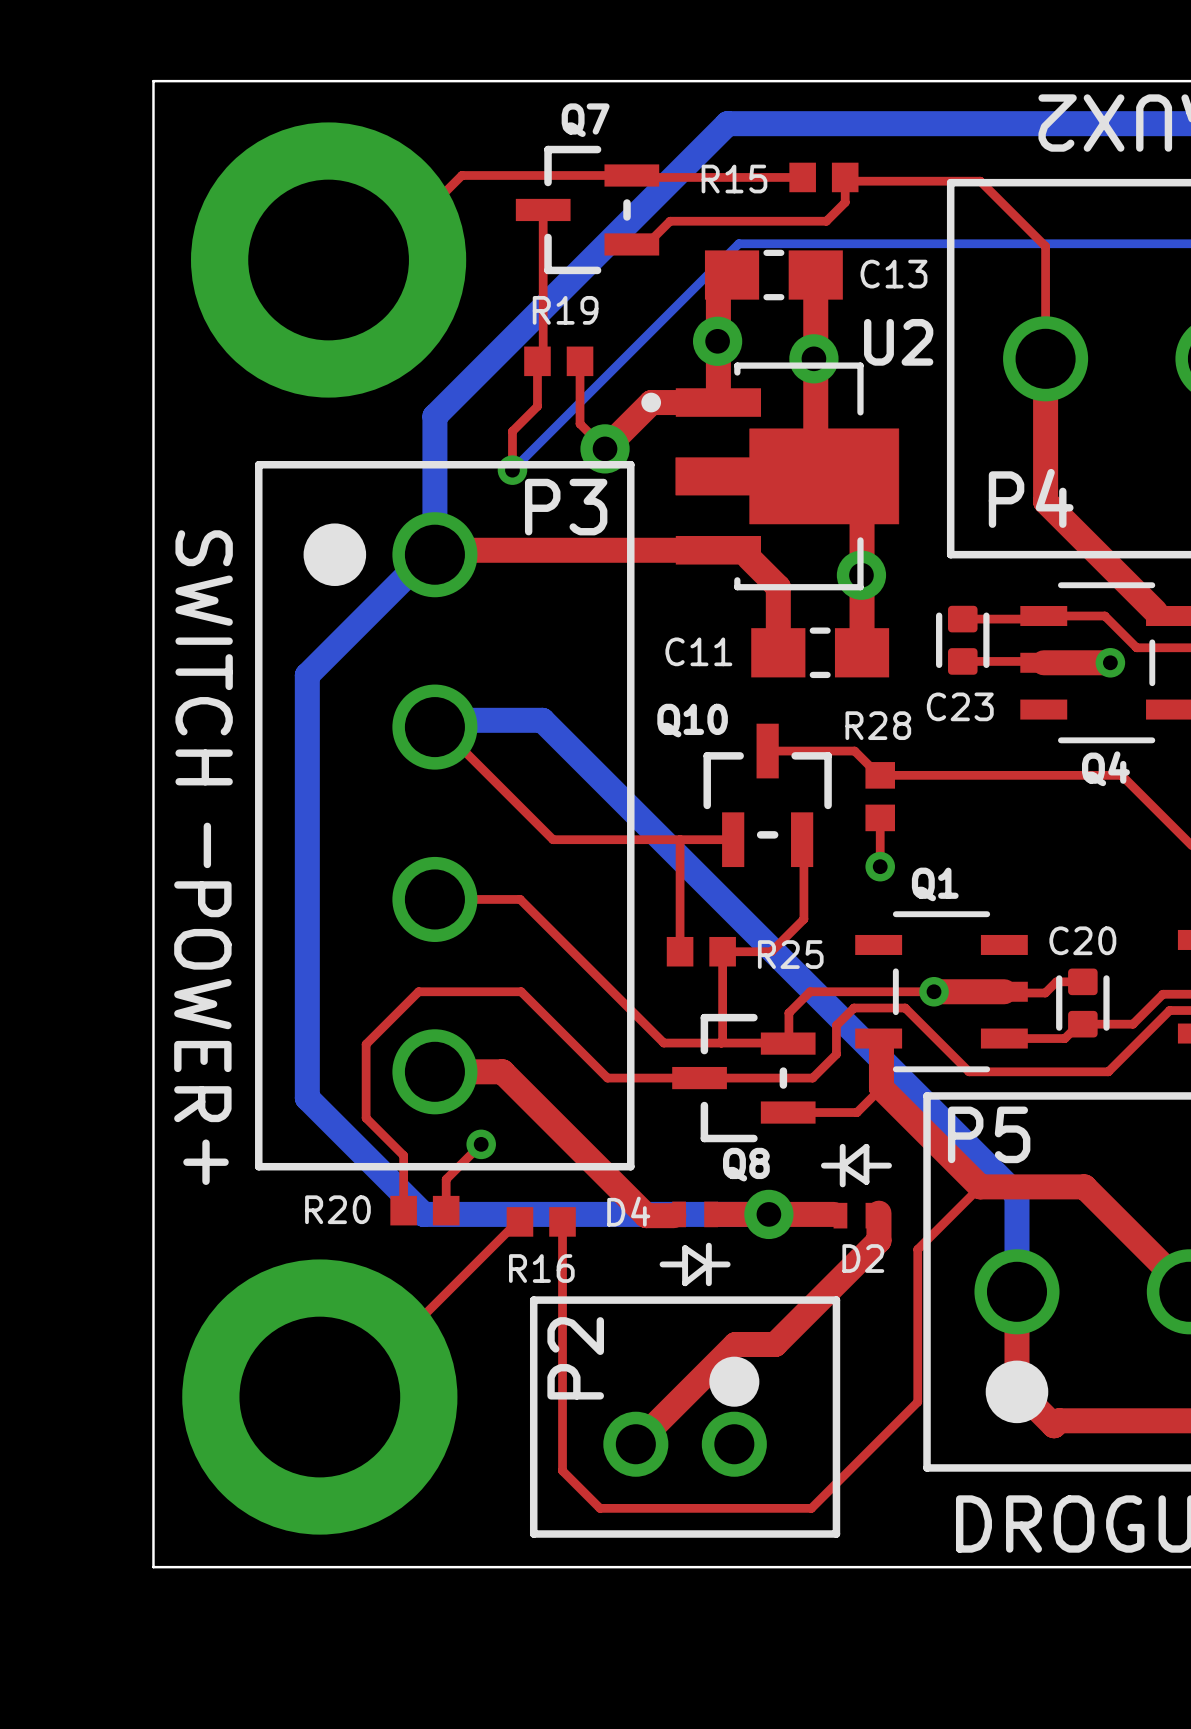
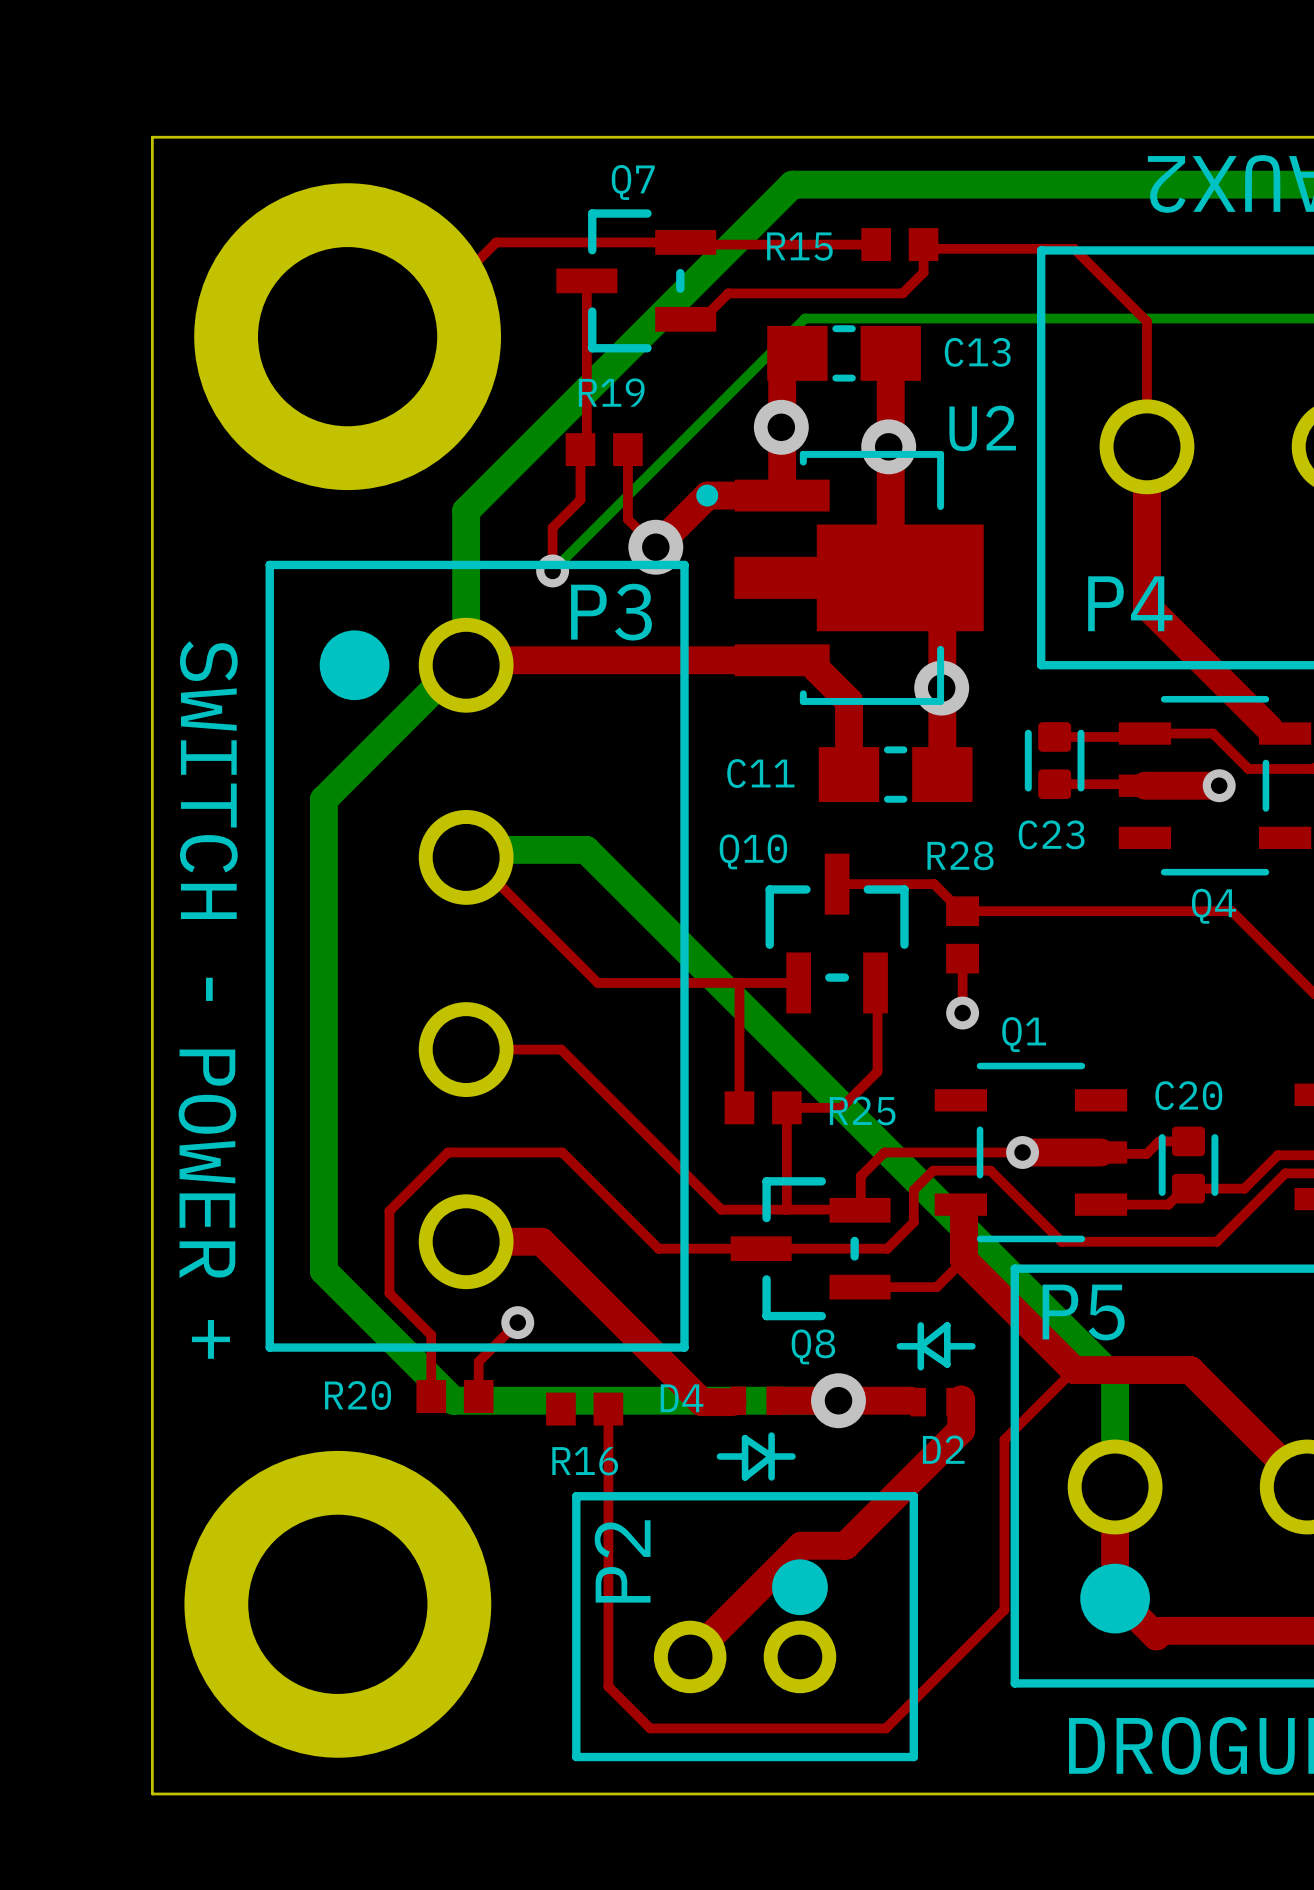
top track: (519, 1221) (517, 1221) (401, 1338) -> none

